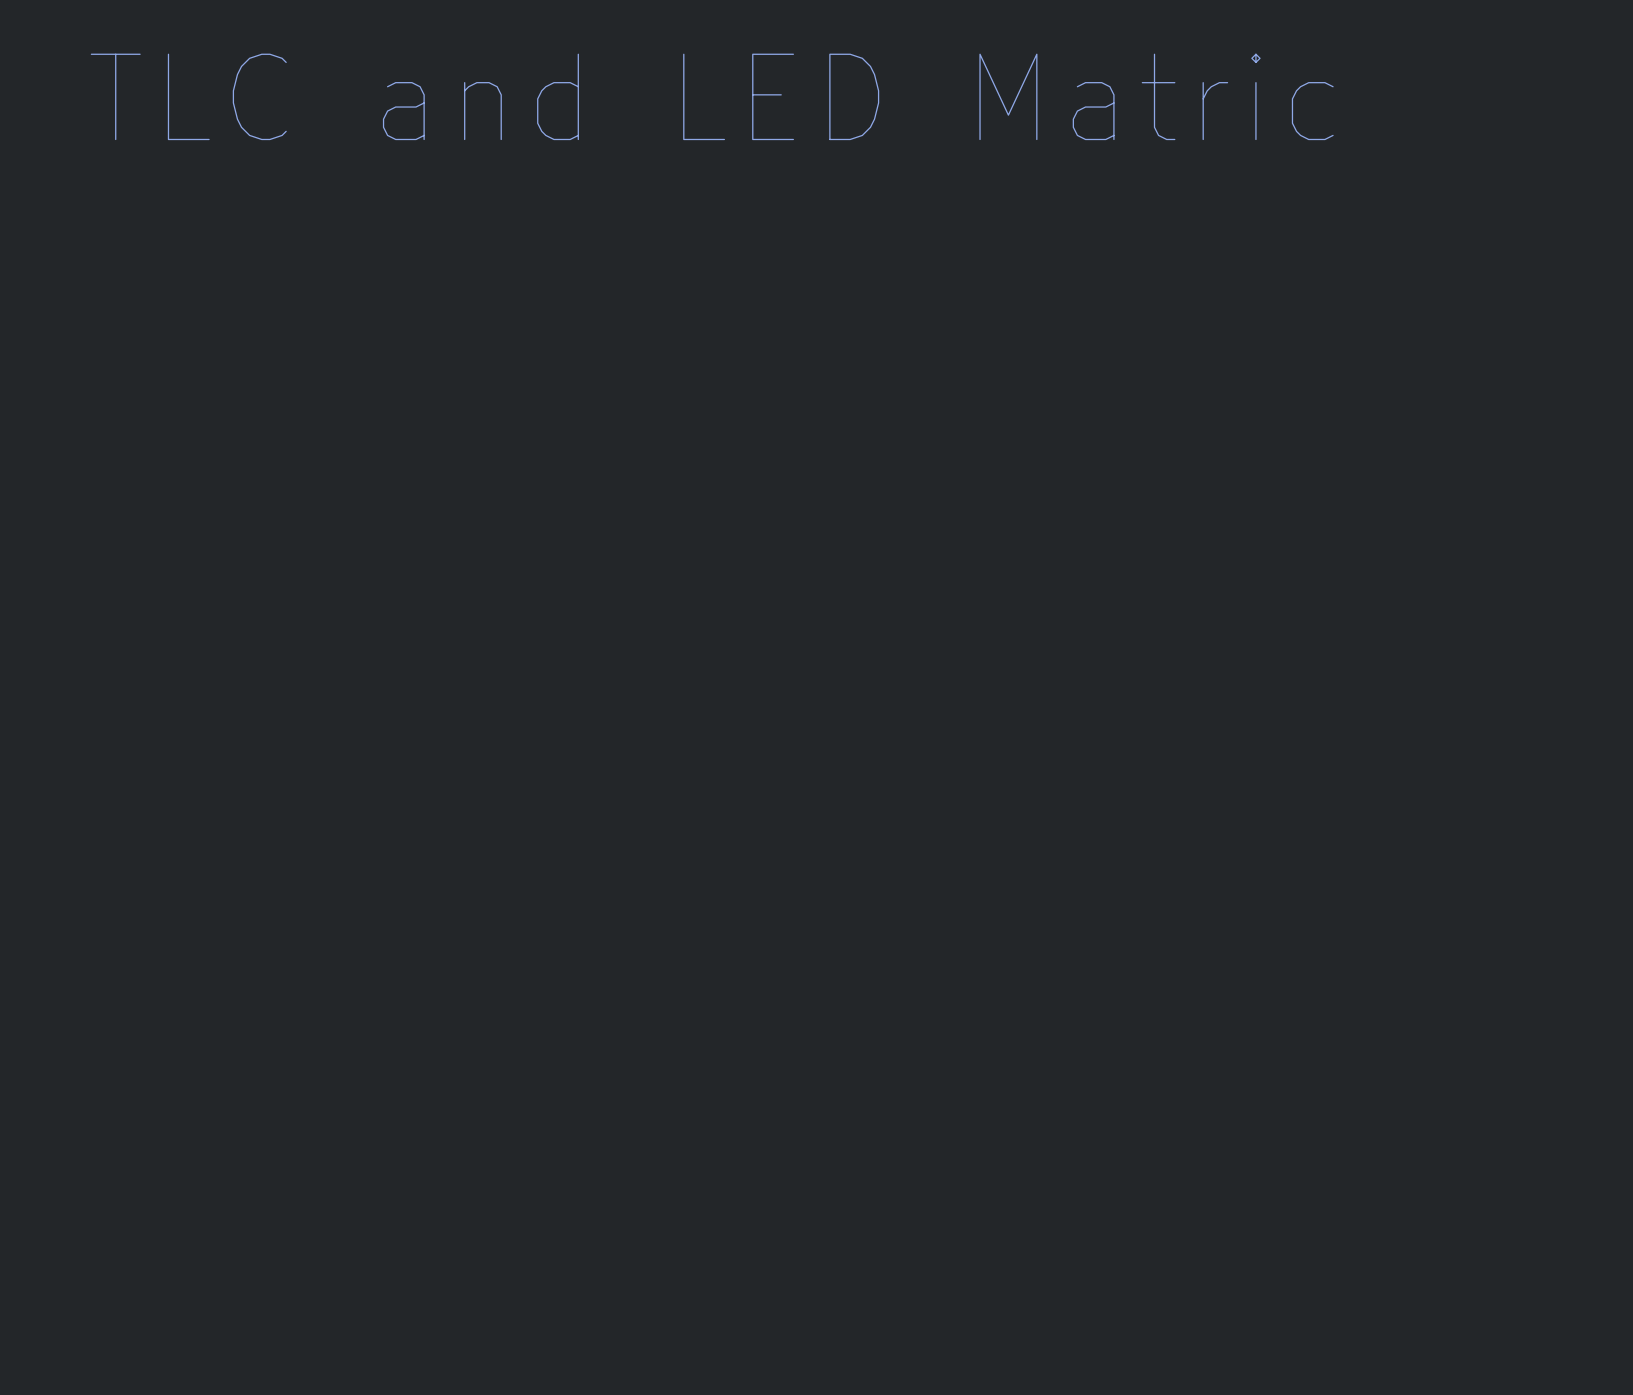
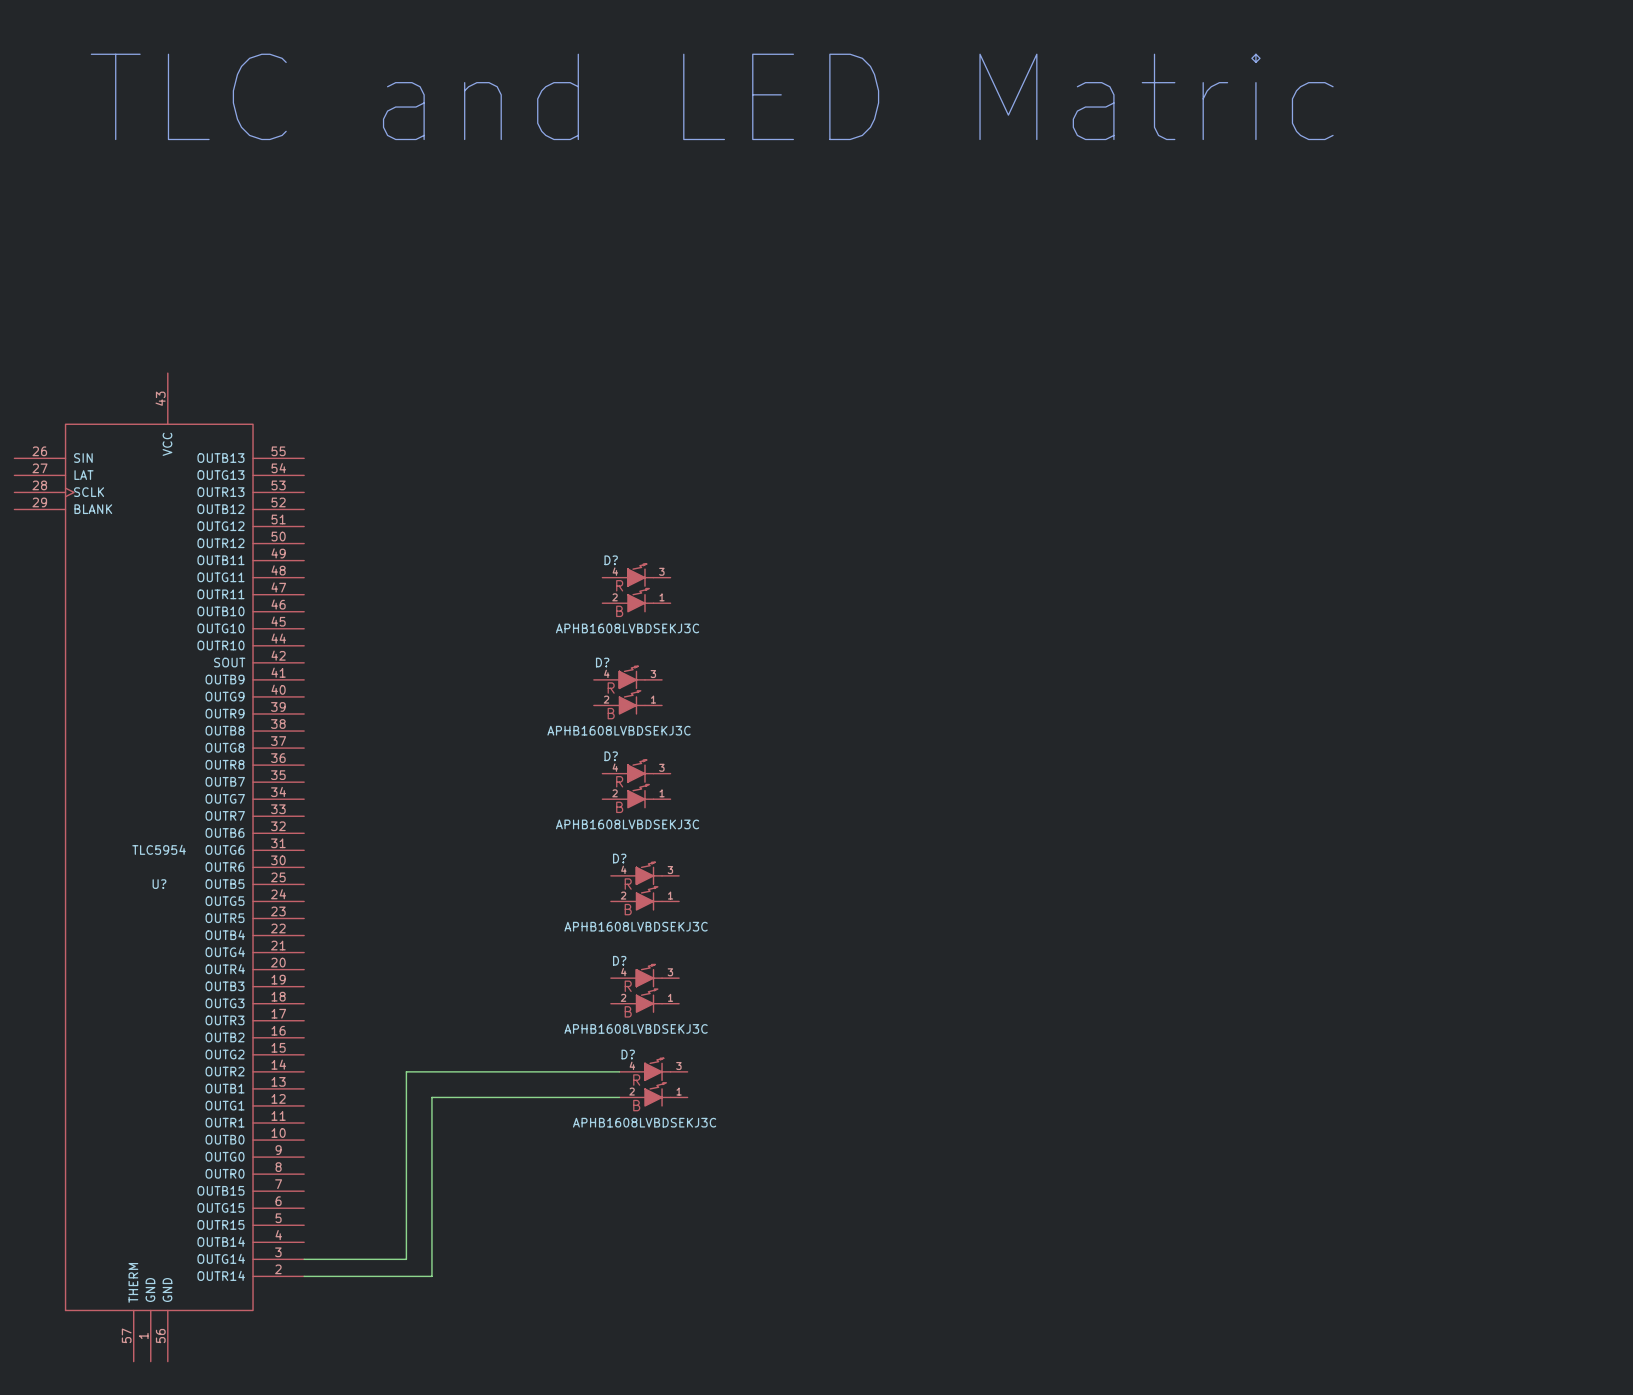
D?: none -> APHB1608LVBDSEKJ3C (636, 587)
D?: none -> APHB1608LVBDSEKJ3C (627, 690)
D?: none -> APHB1608LVBDSEKJ3C (636, 783)
U?: none -> TLC5954 (159, 867)
D?: none -> APHB1608LVBDSEKJ3C (644, 886)
D?: none -> APHB1608LVBDSEKJ3C (644, 988)
wire: none -> (619, 1071) (406, 1071) (406, 1259) (304, 1259)
D?: none -> APHB1608LVBDSEKJ3C (653, 1082)
wire: none -> (619, 1097) (431, 1097) (431, 1276) (304, 1276)

